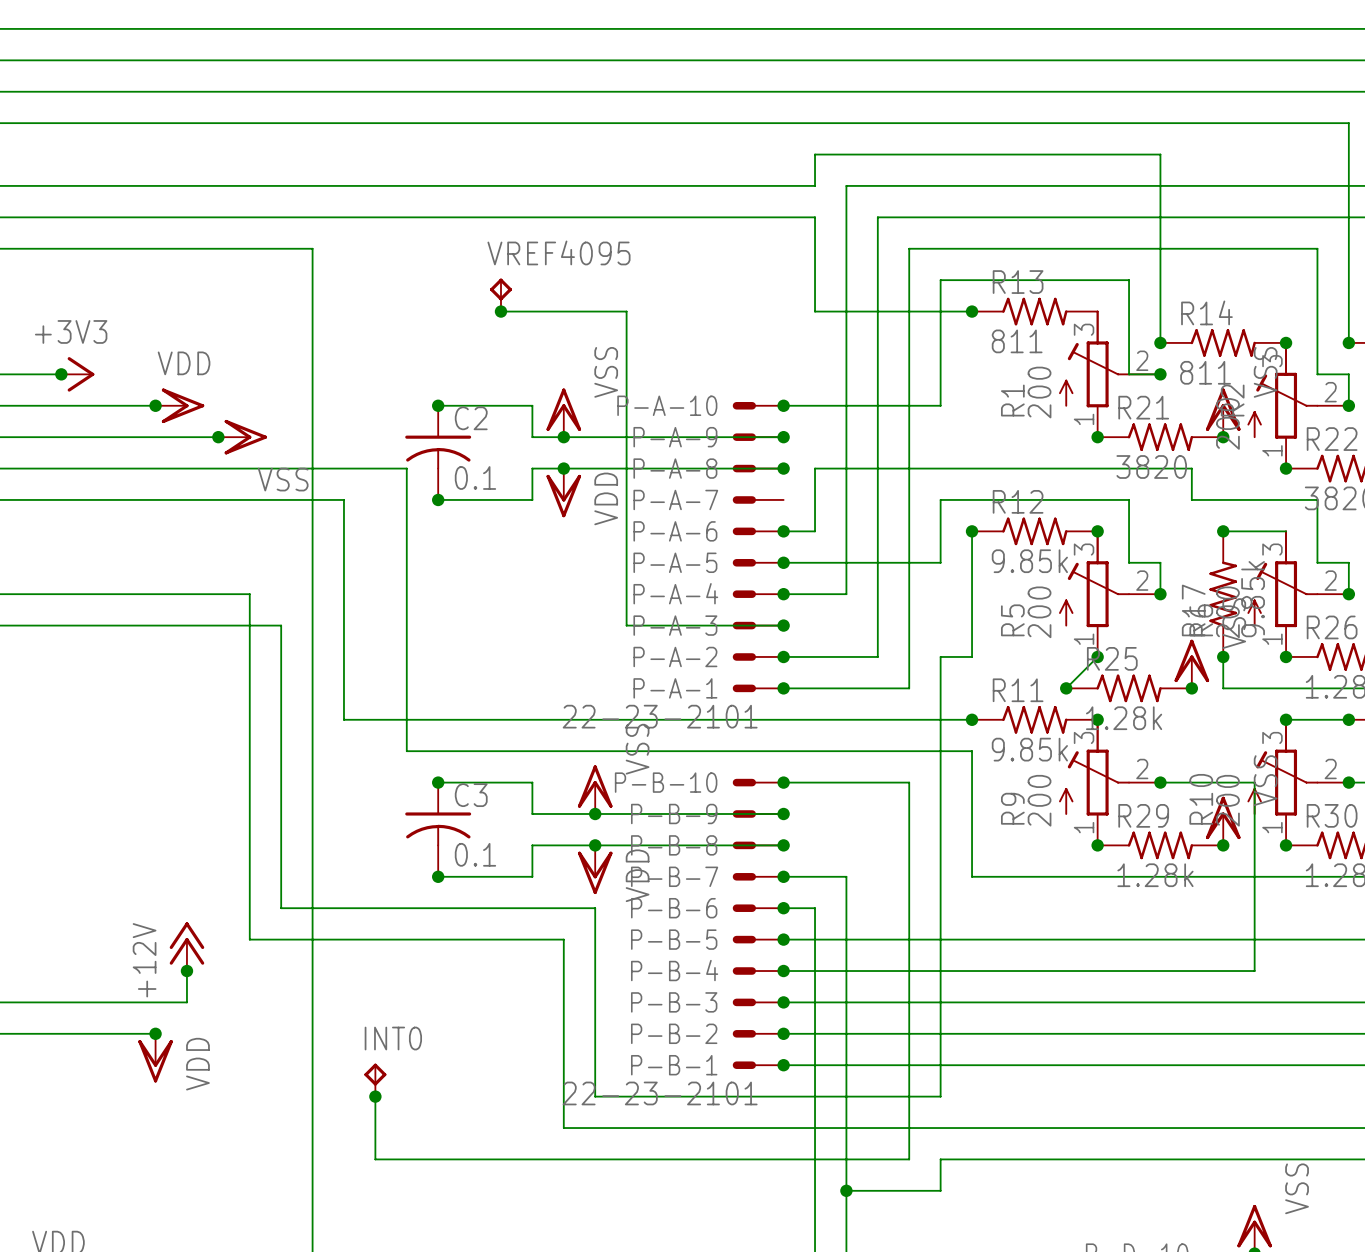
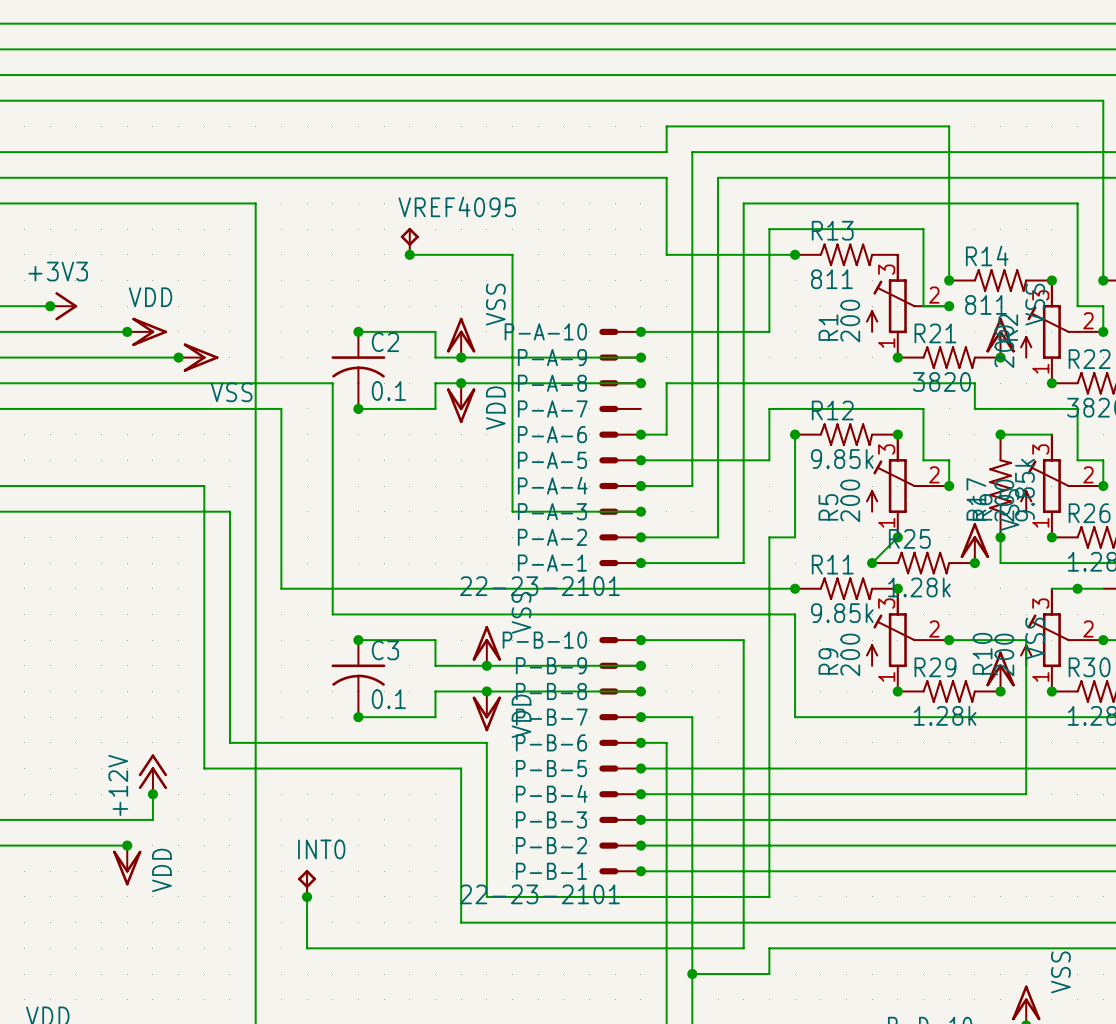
junction: (1286, 719) -> none
junction: none -> (1077, 588)
junction: (1348, 719) -> none

